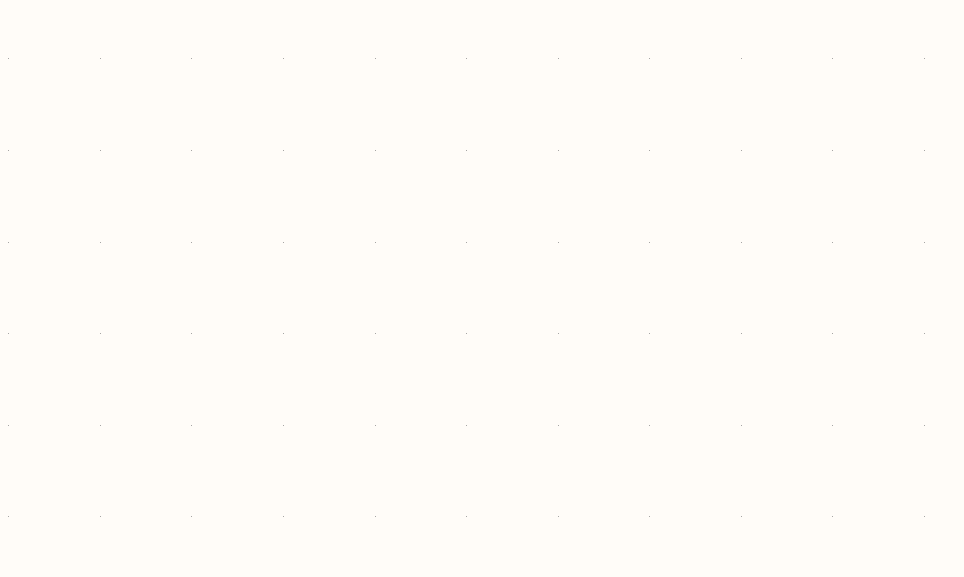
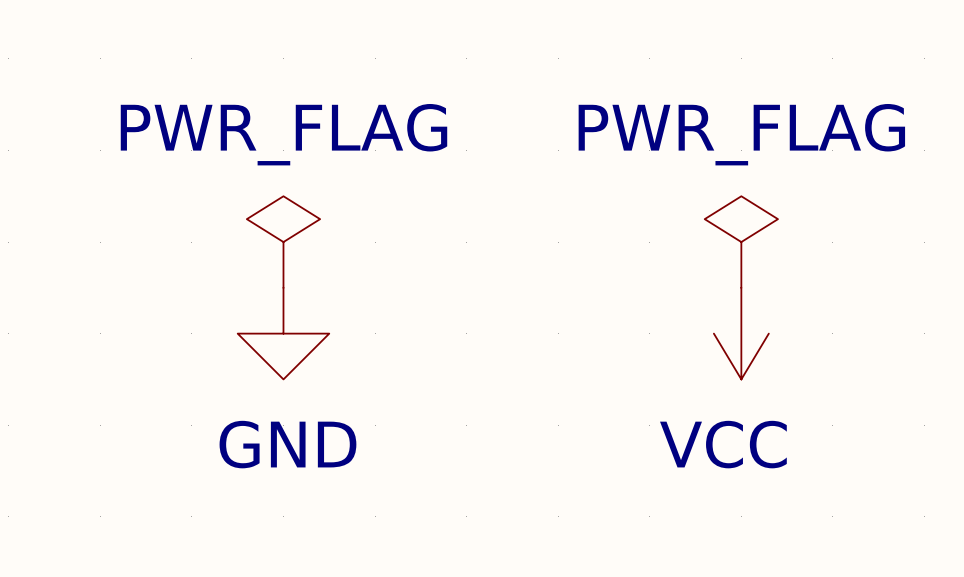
power symbol: none -> PWR_FLAG (283, 242)
power symbol: none -> PWR_FLAG (741, 242)
power symbol: none -> GND (283, 333)
power symbol: none -> VCC (741, 333)

